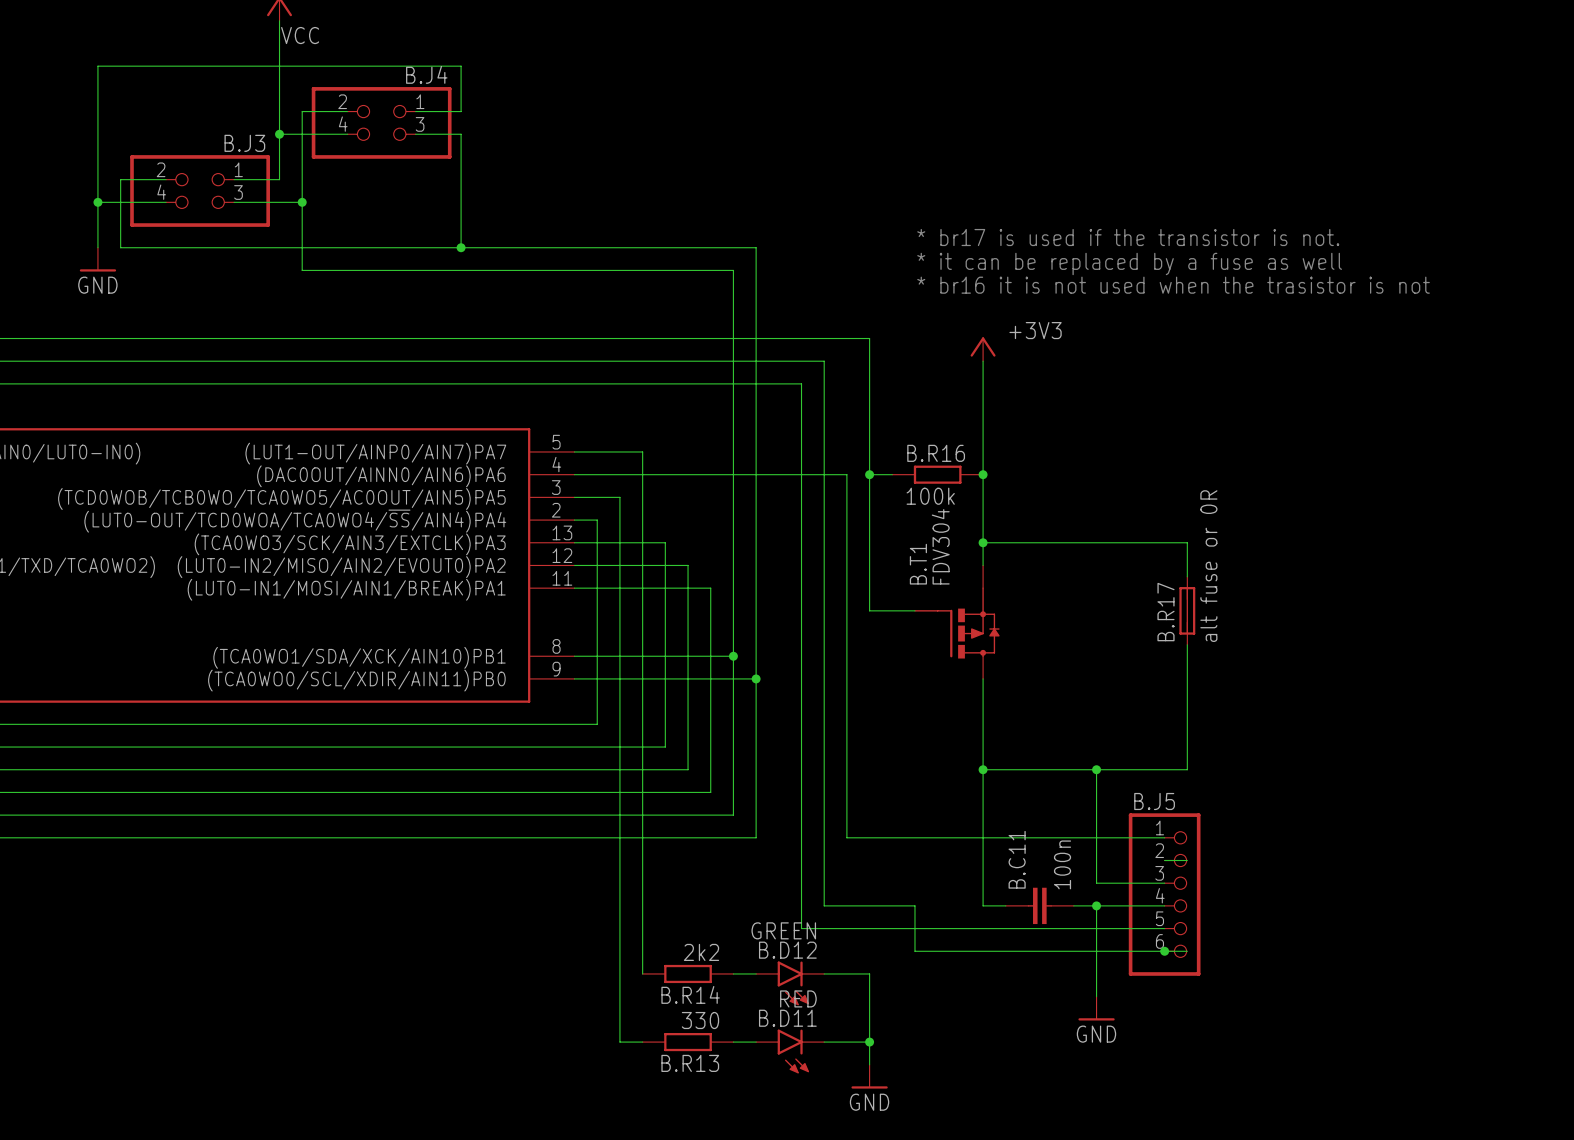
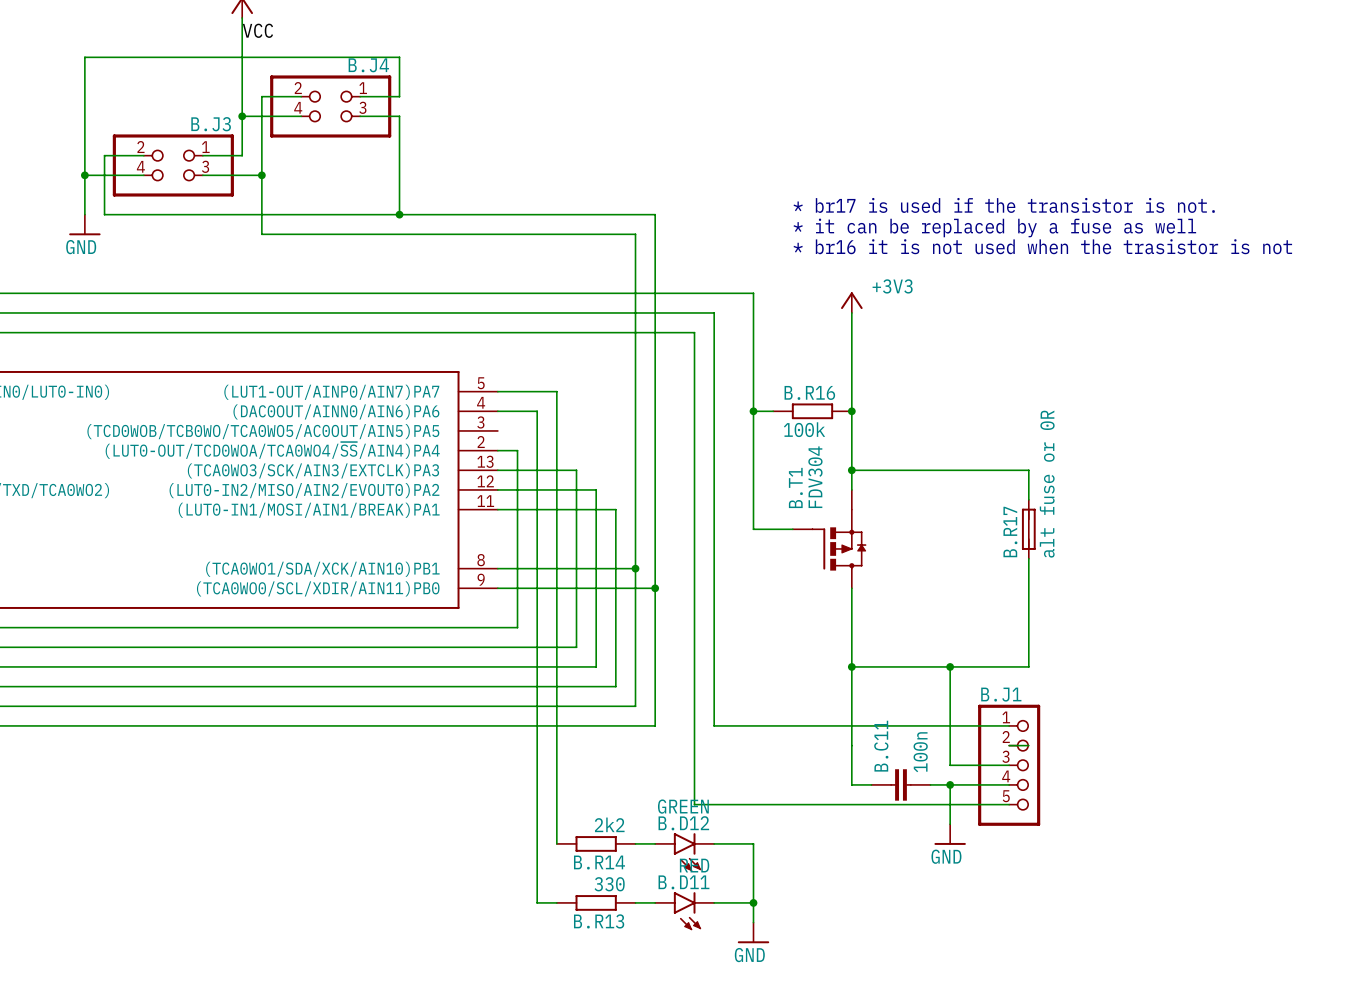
wire: (619, 474) (846, 474) (846, 837) -> none
wire: (574, 497) (619, 497) -> (537, 411) (537, 430)
wire: (824, 837) (824, 905) (914, 905) (914, 951) (1187, 951) -> (714, 725) (733, 725)
B.J1: none -> (1009, 765)
B.J5: (1164, 894) -> none
junction: (1164, 951) -> none
power symbol position: GND (1096, 1008) -> GND (950, 834)

